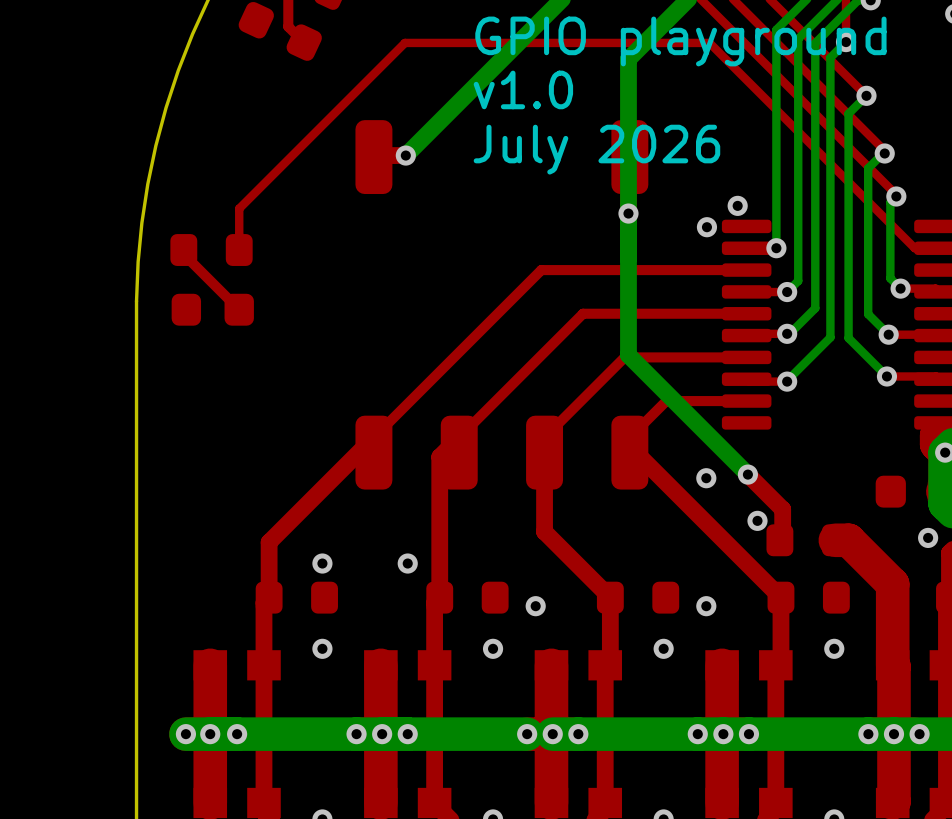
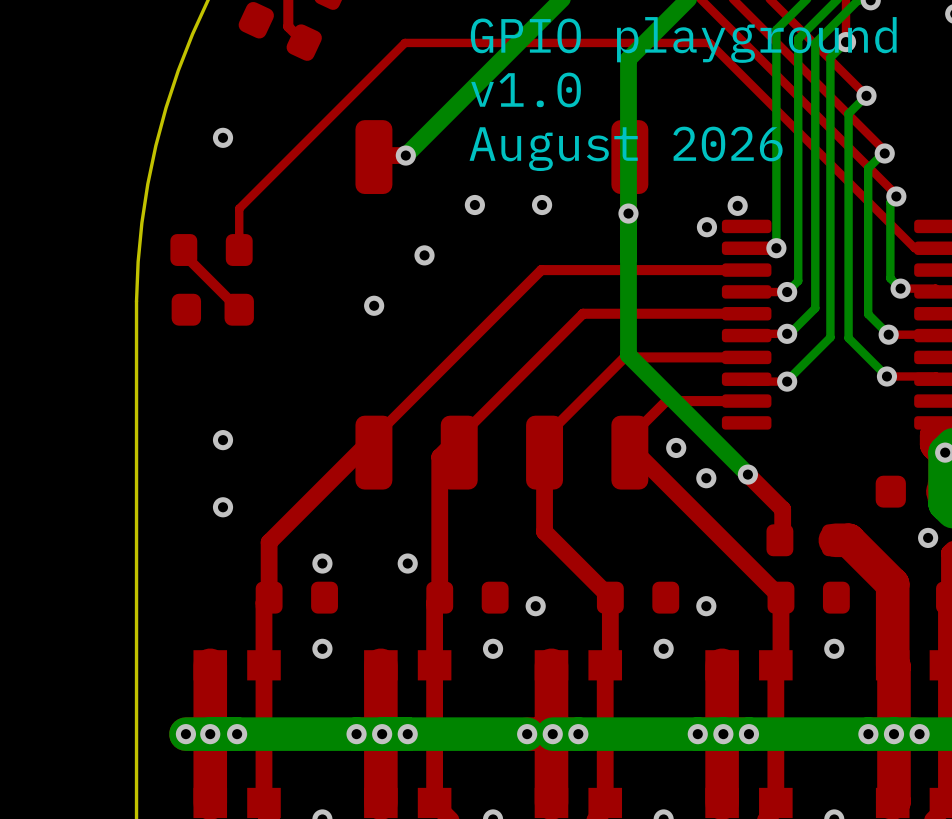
via: none -> (223, 137)
text: July 2026 (596, 149) -> August 2026 (626, 148)
via: none -> (474, 205)
via: none -> (542, 205)
via: none -> (424, 255)
via: none -> (374, 305)
via: none -> (223, 440)
via: none -> (223, 507)
via position: (757, 520) -> (676, 447)

